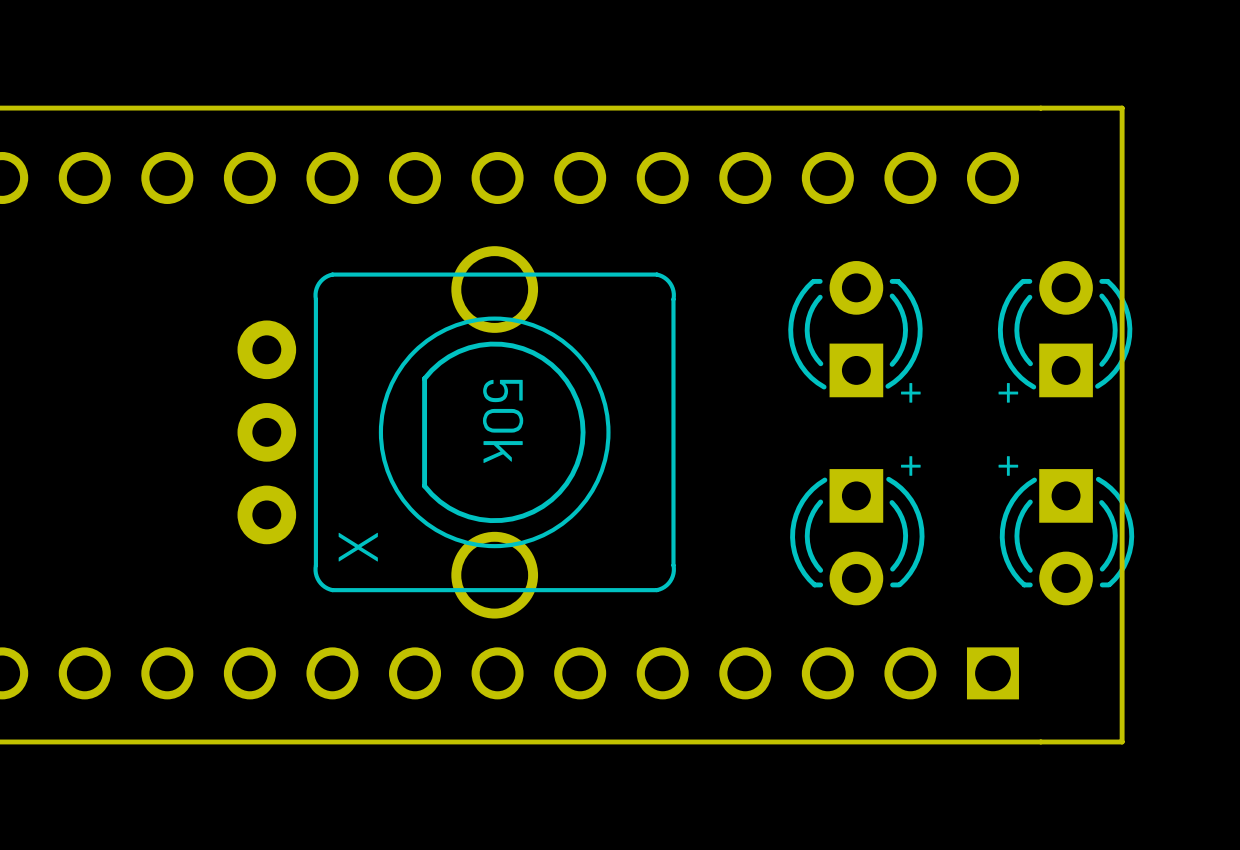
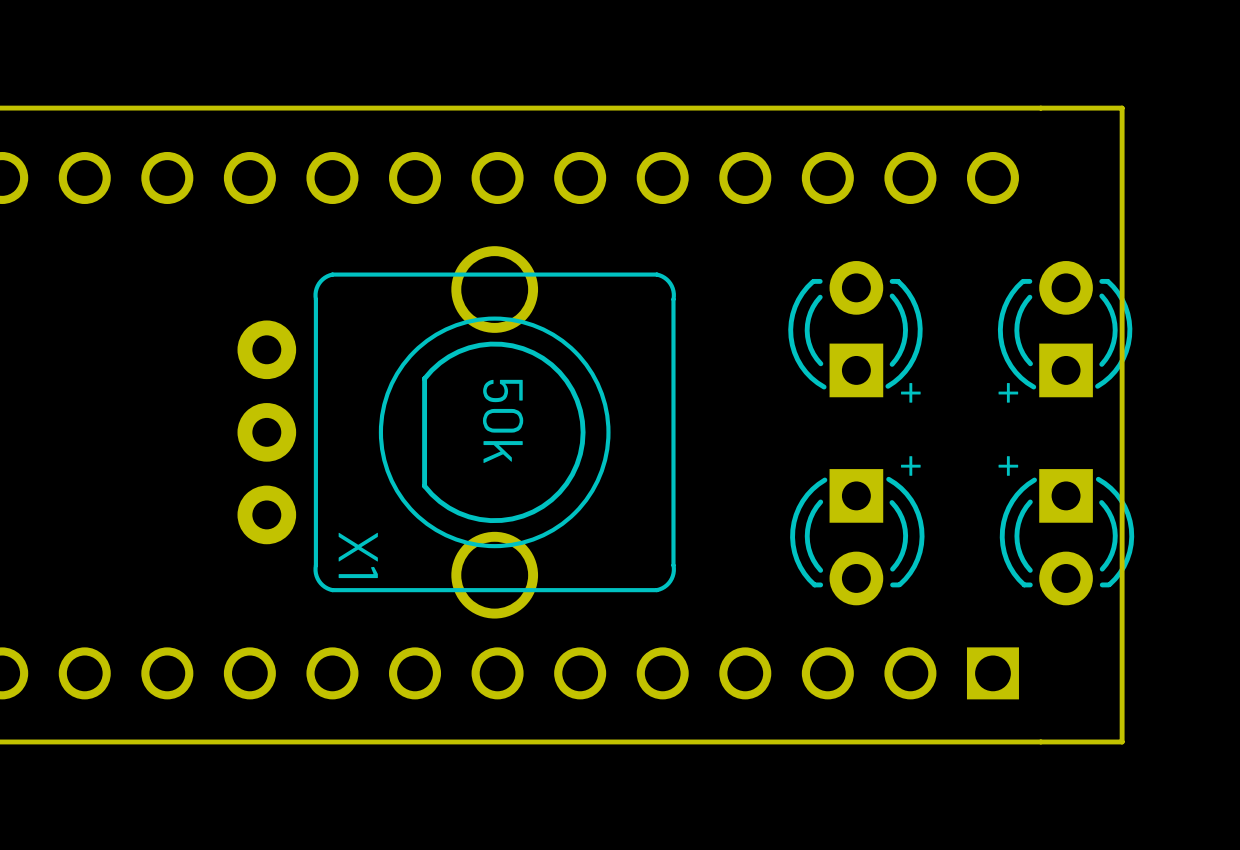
X name: X (358, 547) -> X1 (358, 555)

